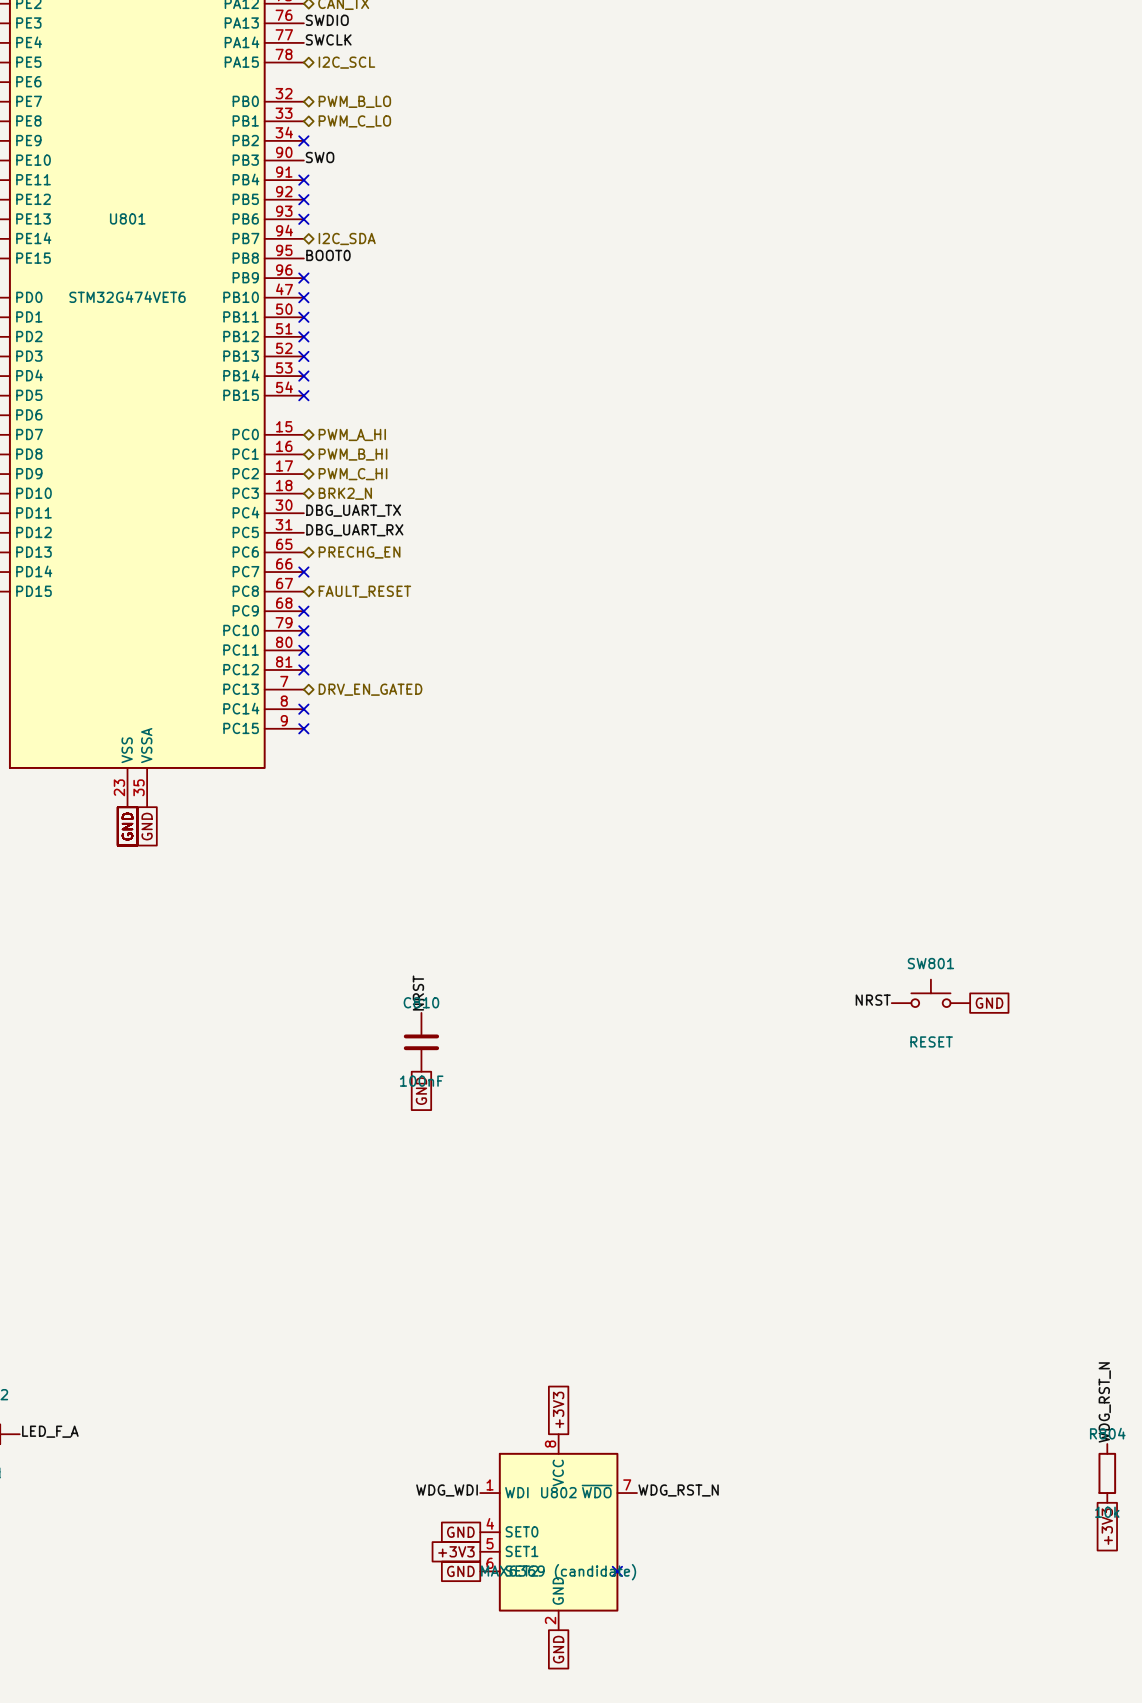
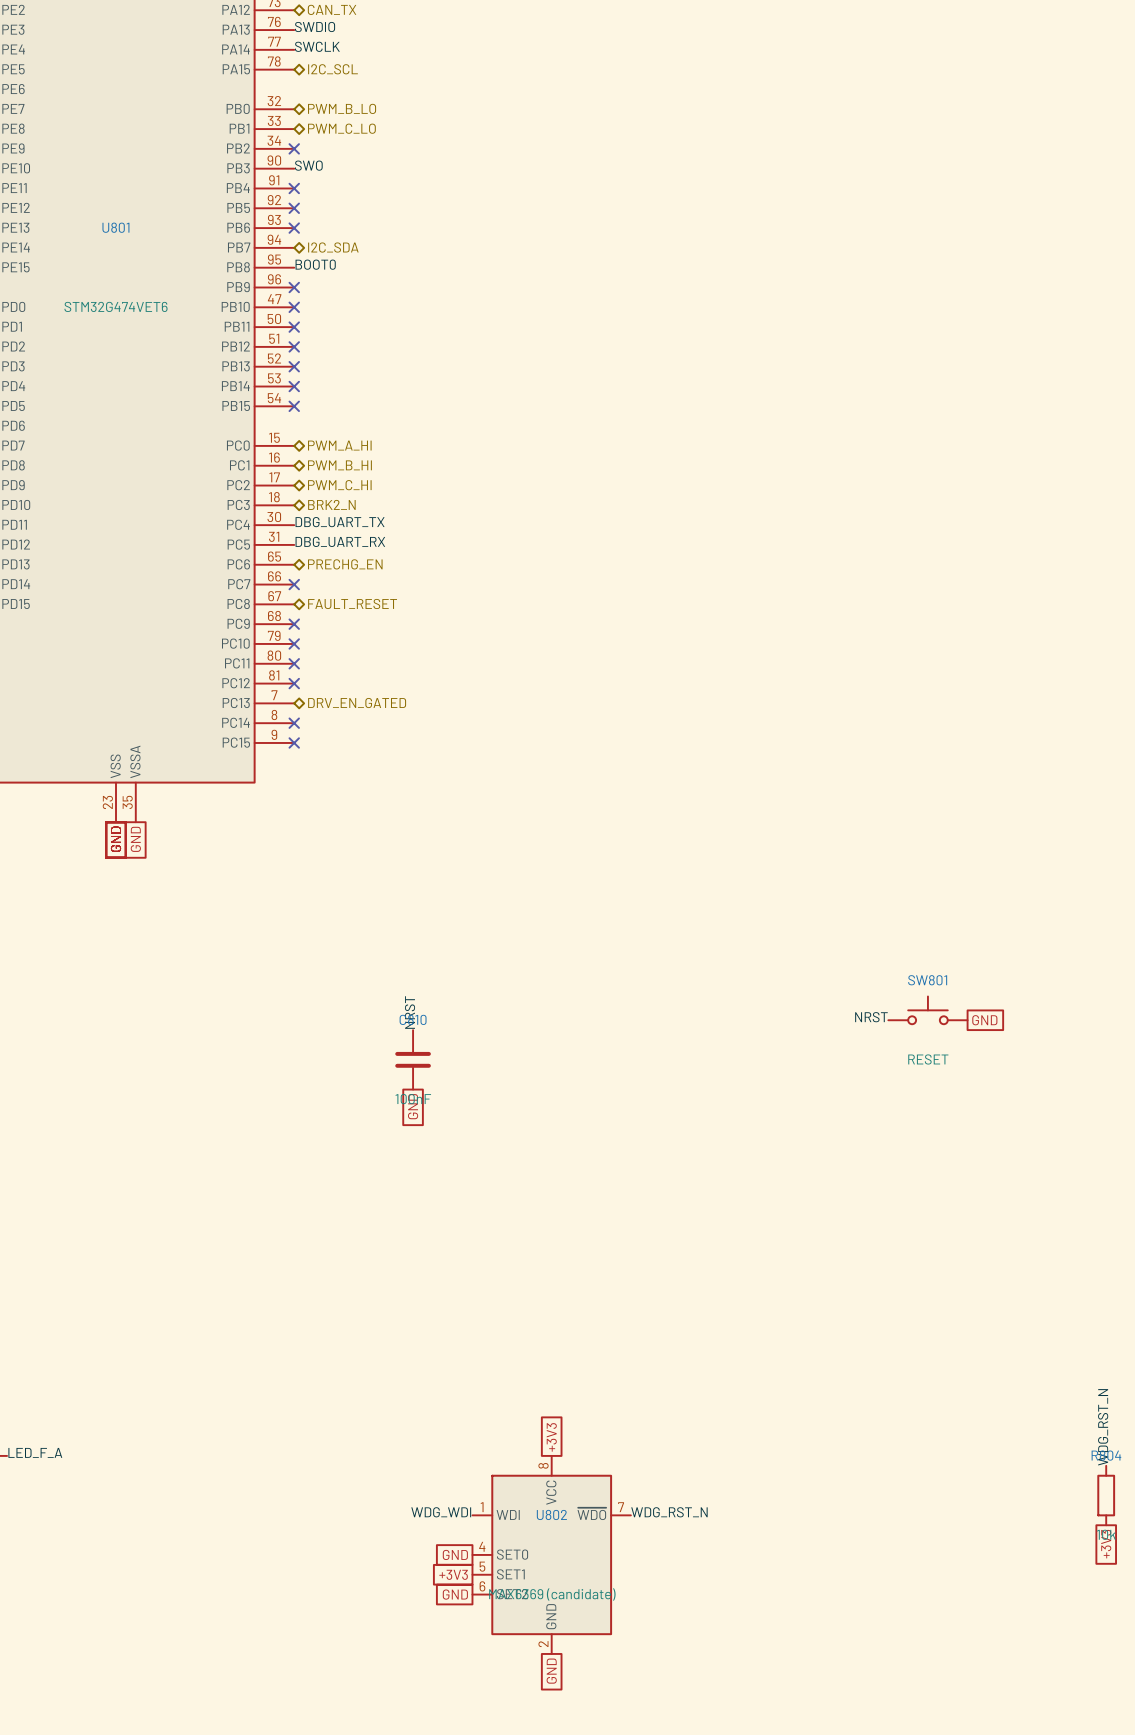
no-connect mark: (617, 1571) -> none

